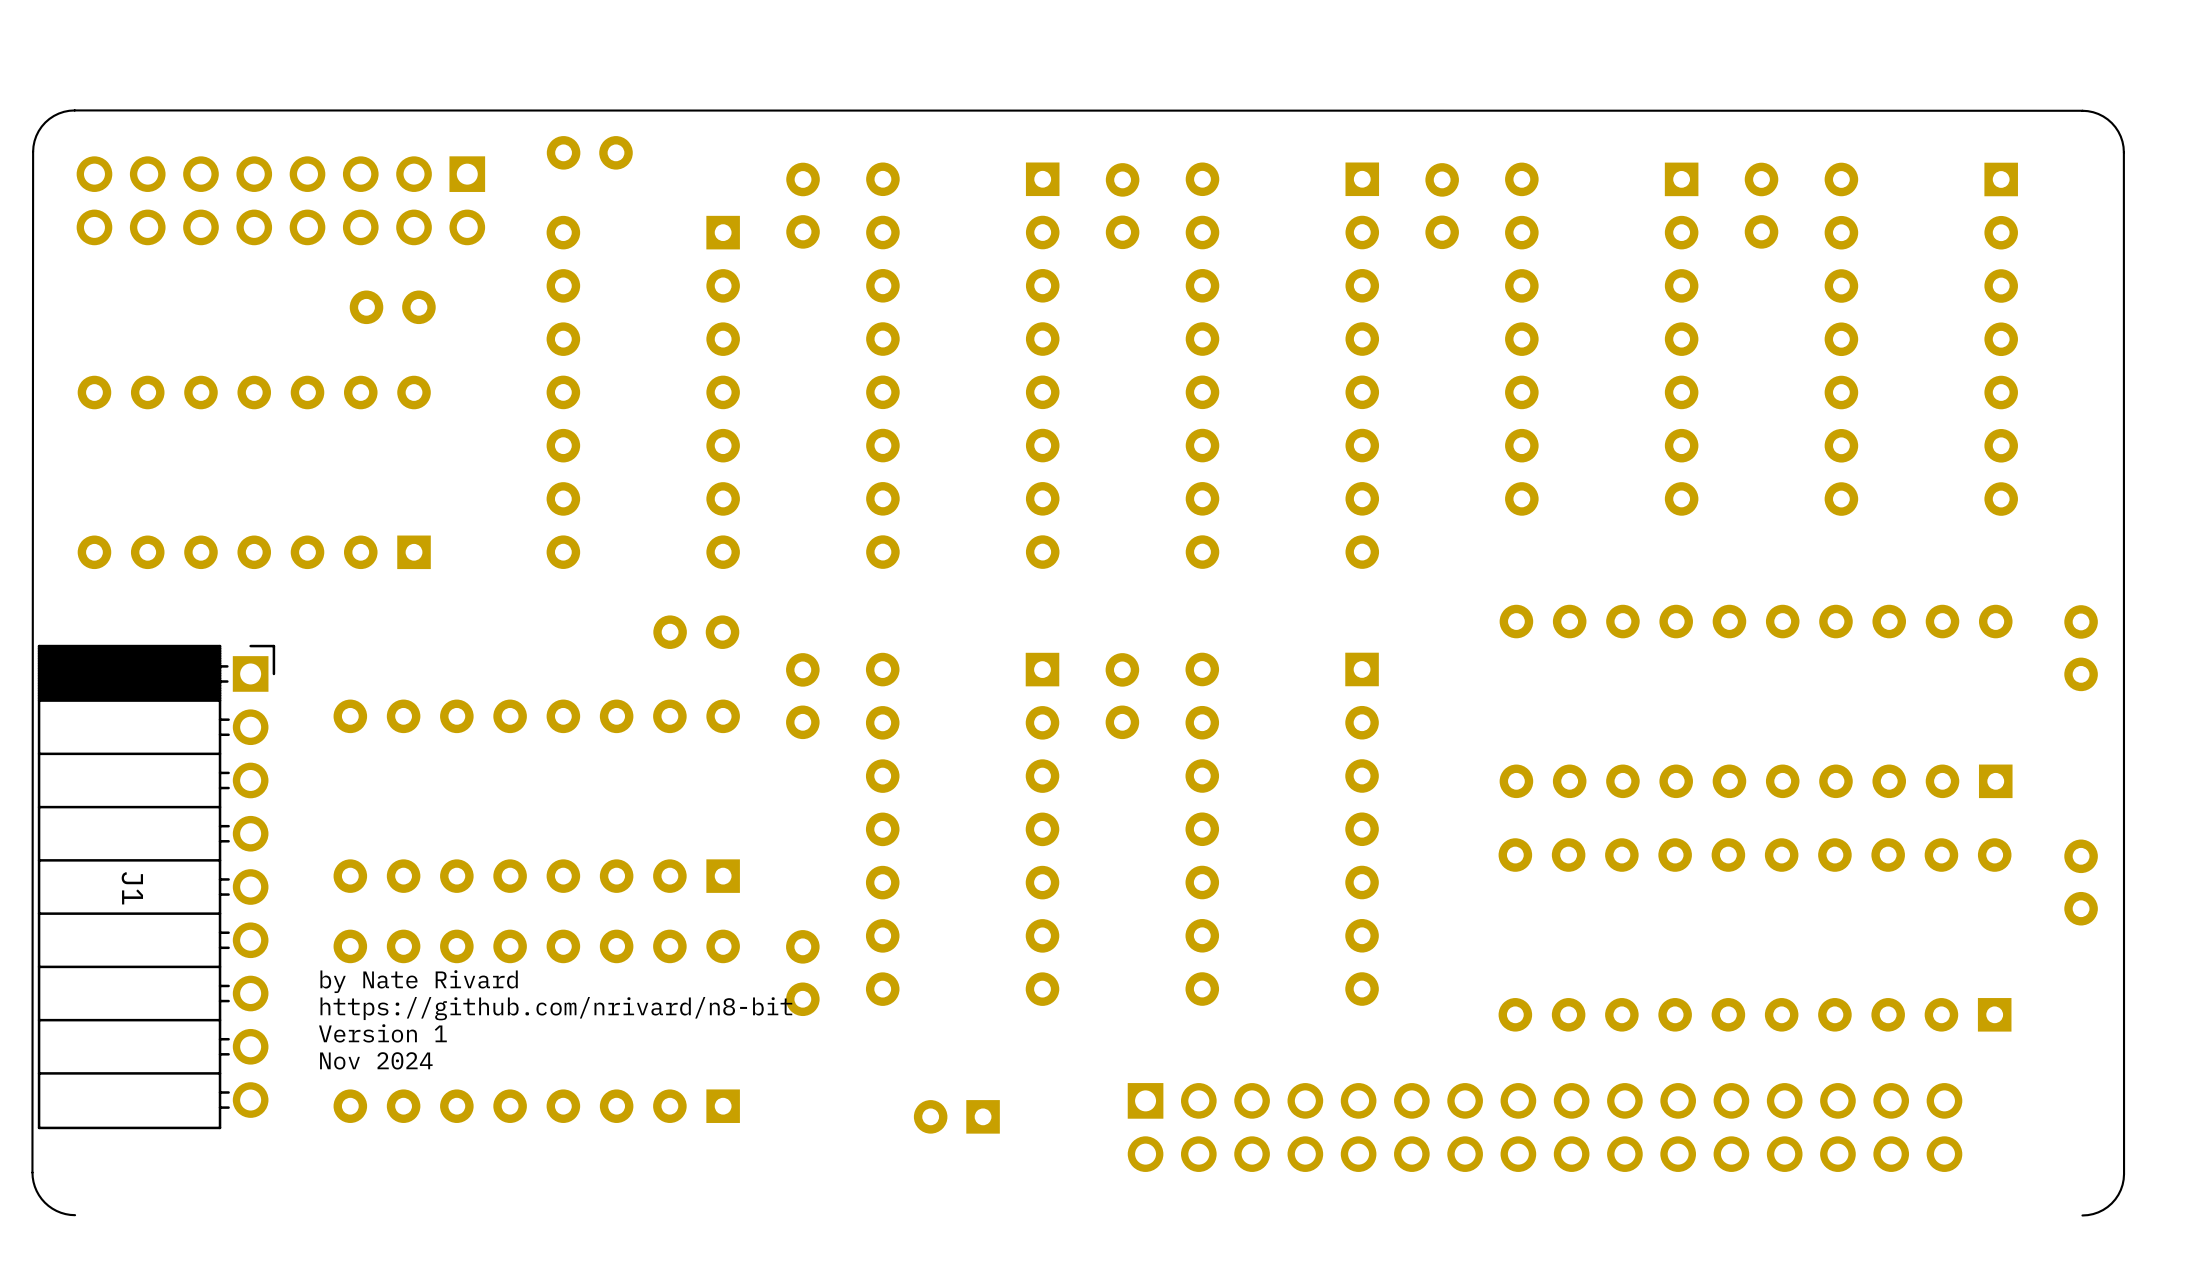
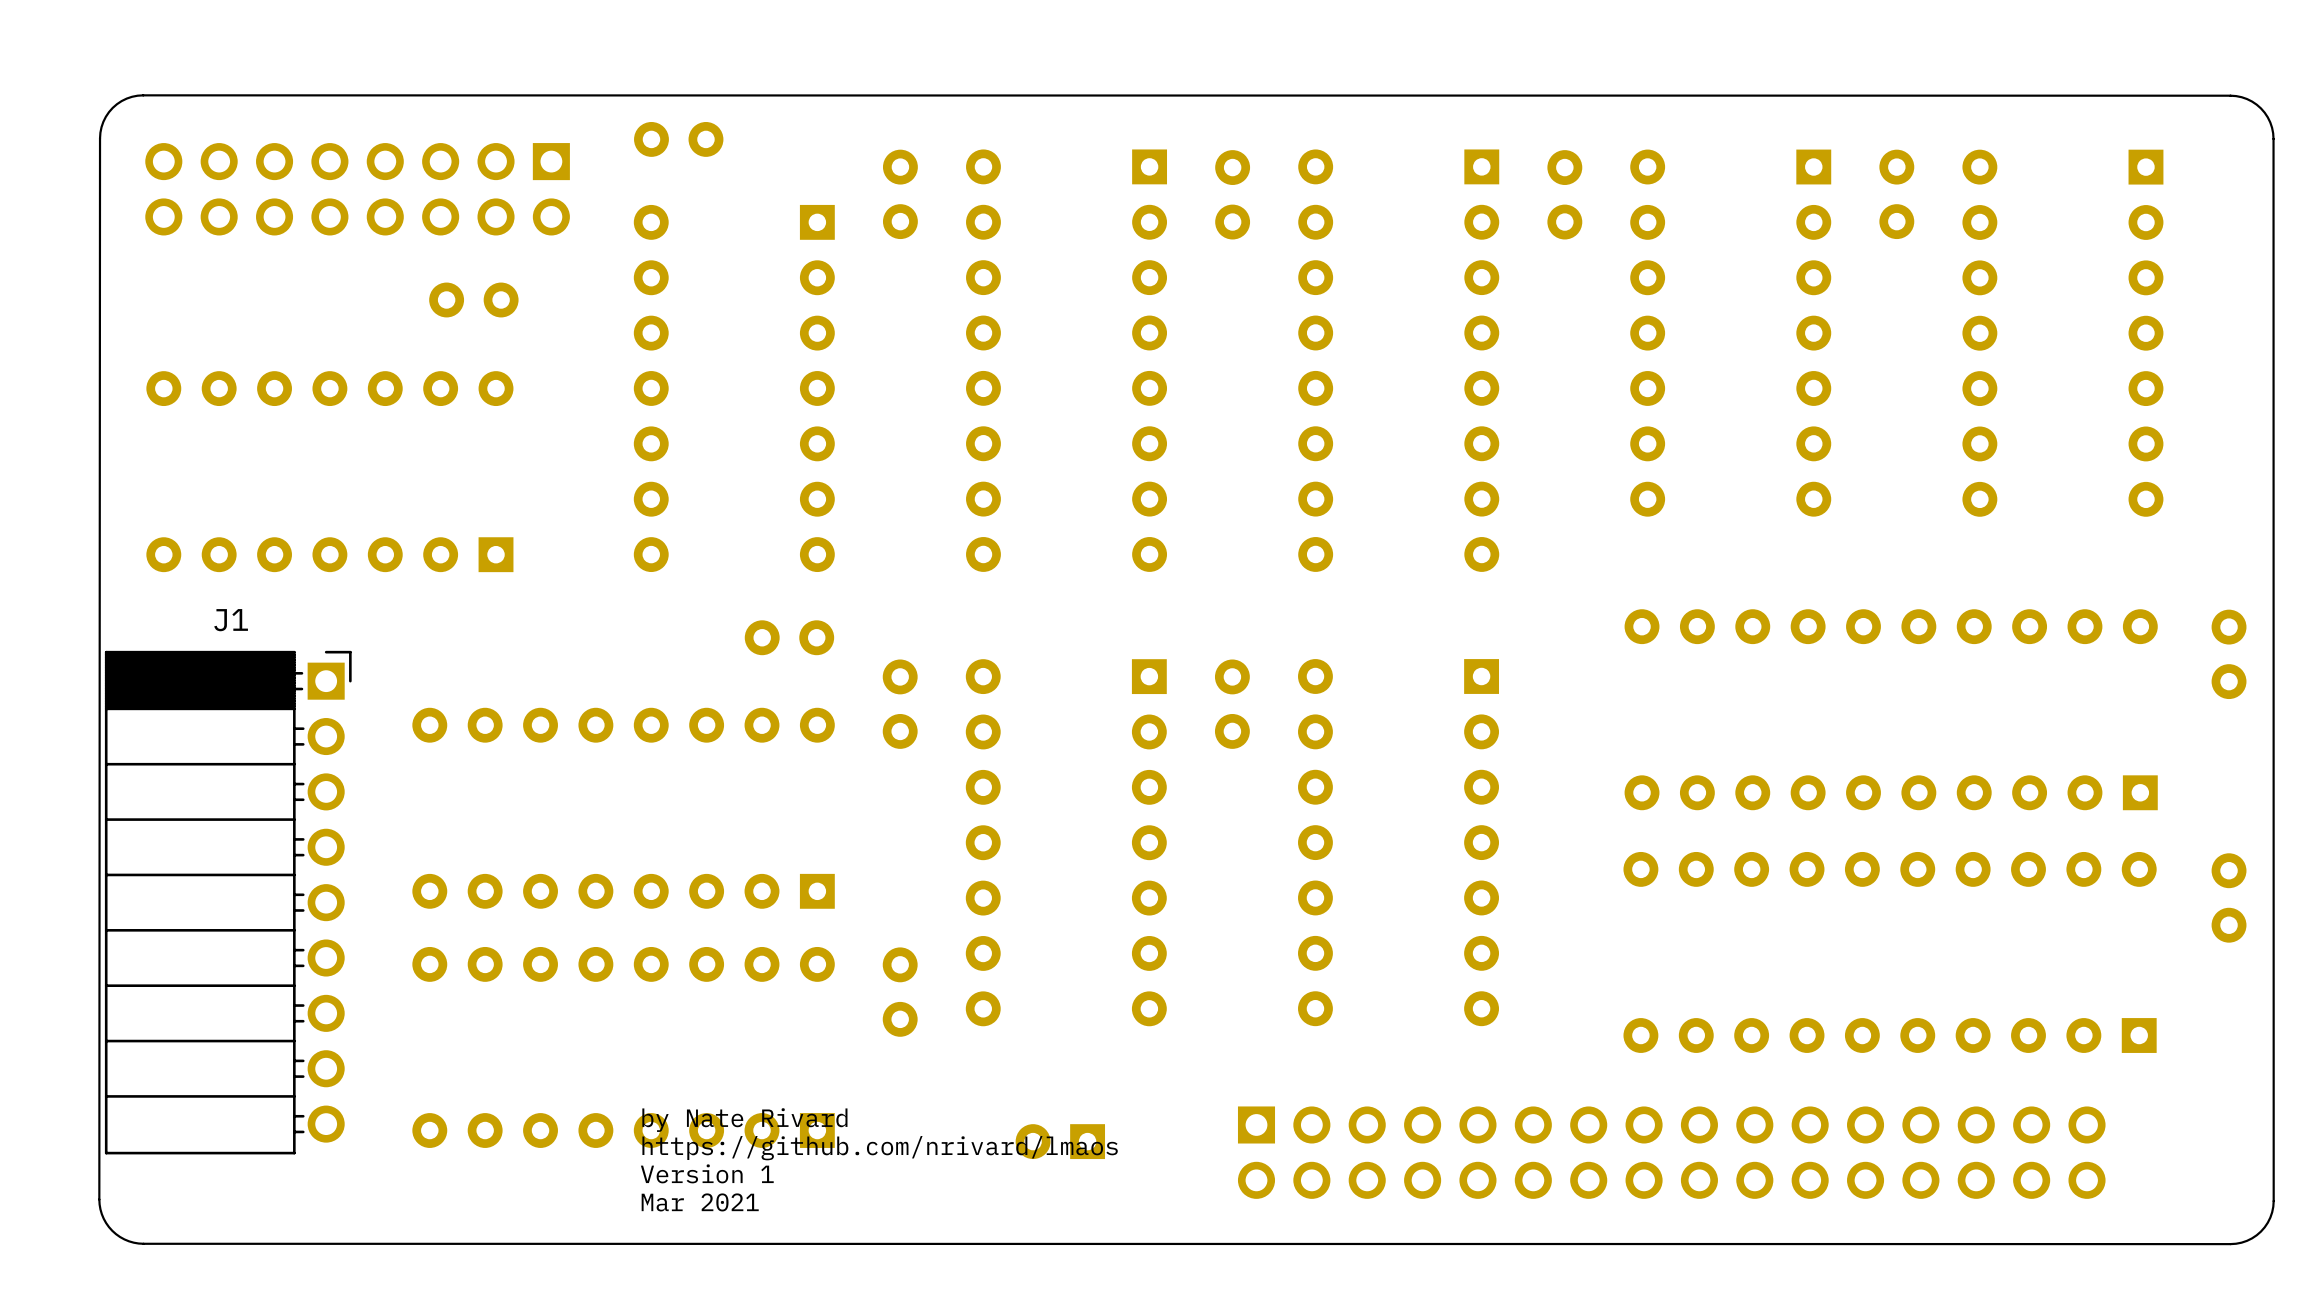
J1 name rotation: 0° (132, 888) -> 90° counterclockwise (231, 620)
J1 name position: J1 (132, 888) -> J1 (231, 620)
text position: by Nate Rivard (419, 981) -> by Nate Rivard (744, 1120)
text: https://github.com/nrivard/n8-bit (556, 1008) -> none
text position: Version 1 (382, 1033) -> Version 1 (707, 1173)
text: Nov 2024 (376, 1060) -> none
text: none -> https://github.com/nrivard/lmaos (880, 1148)
text: none -> Mar 2021 (700, 1202)
board edge: none -> (143, 1243) (2230, 1244)

